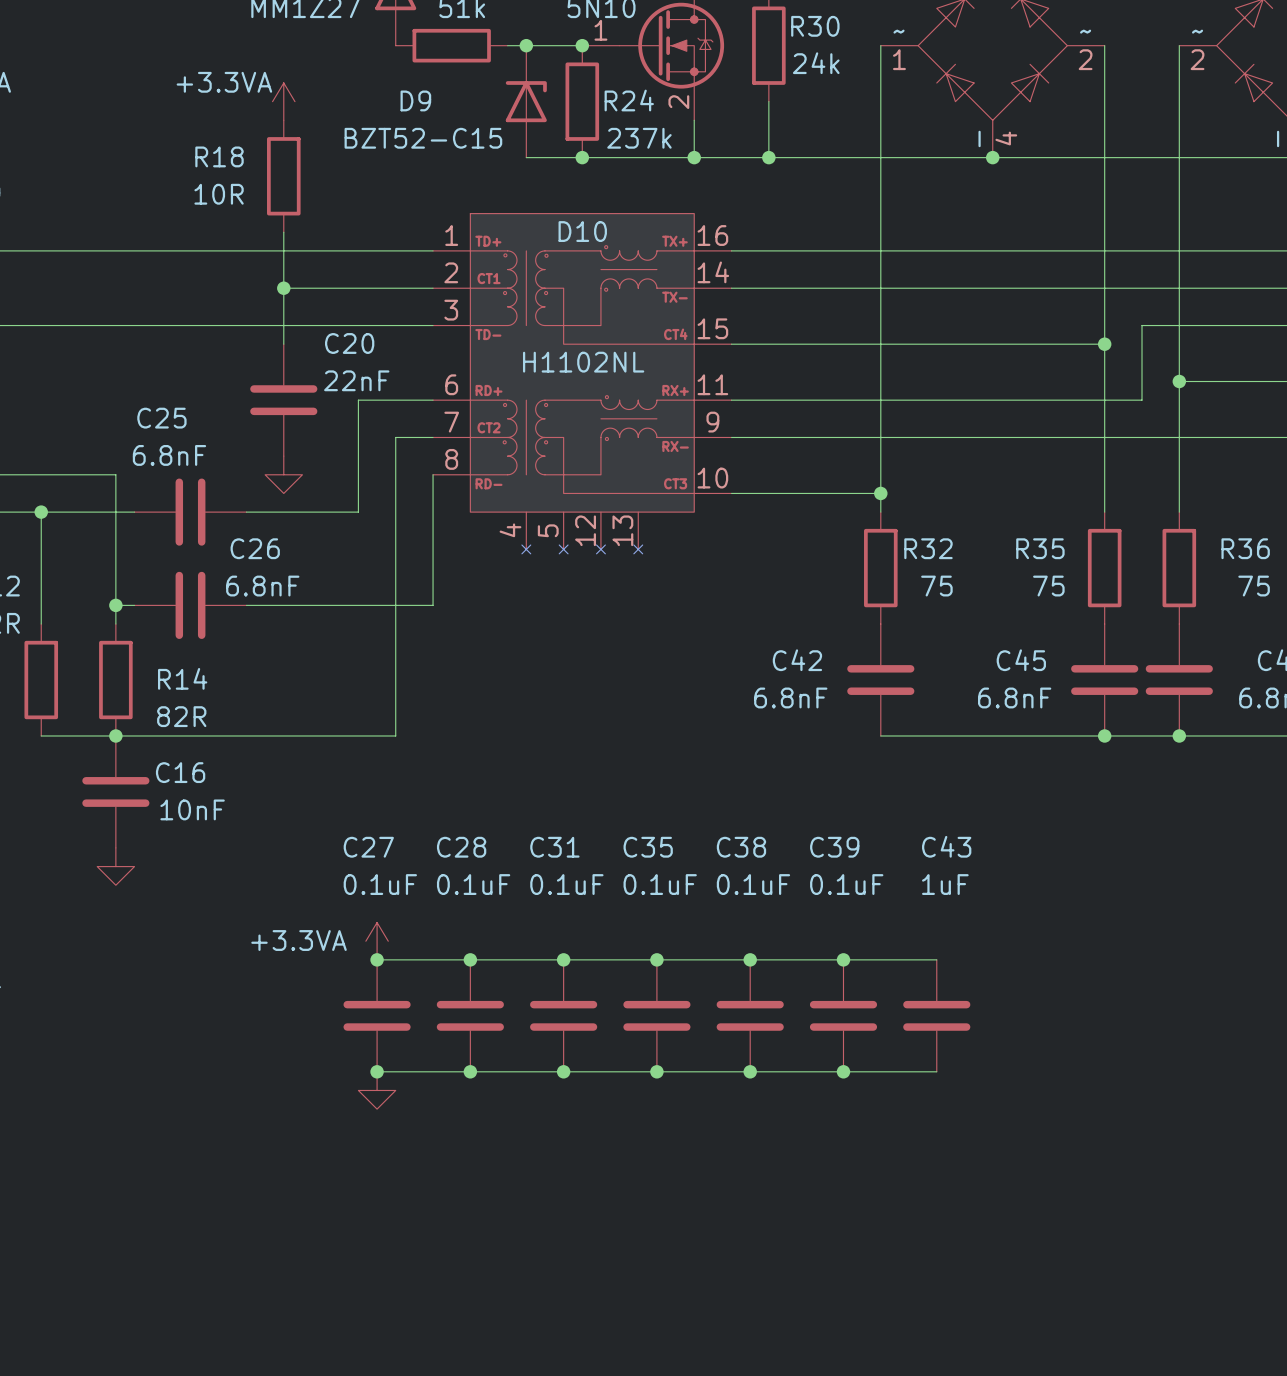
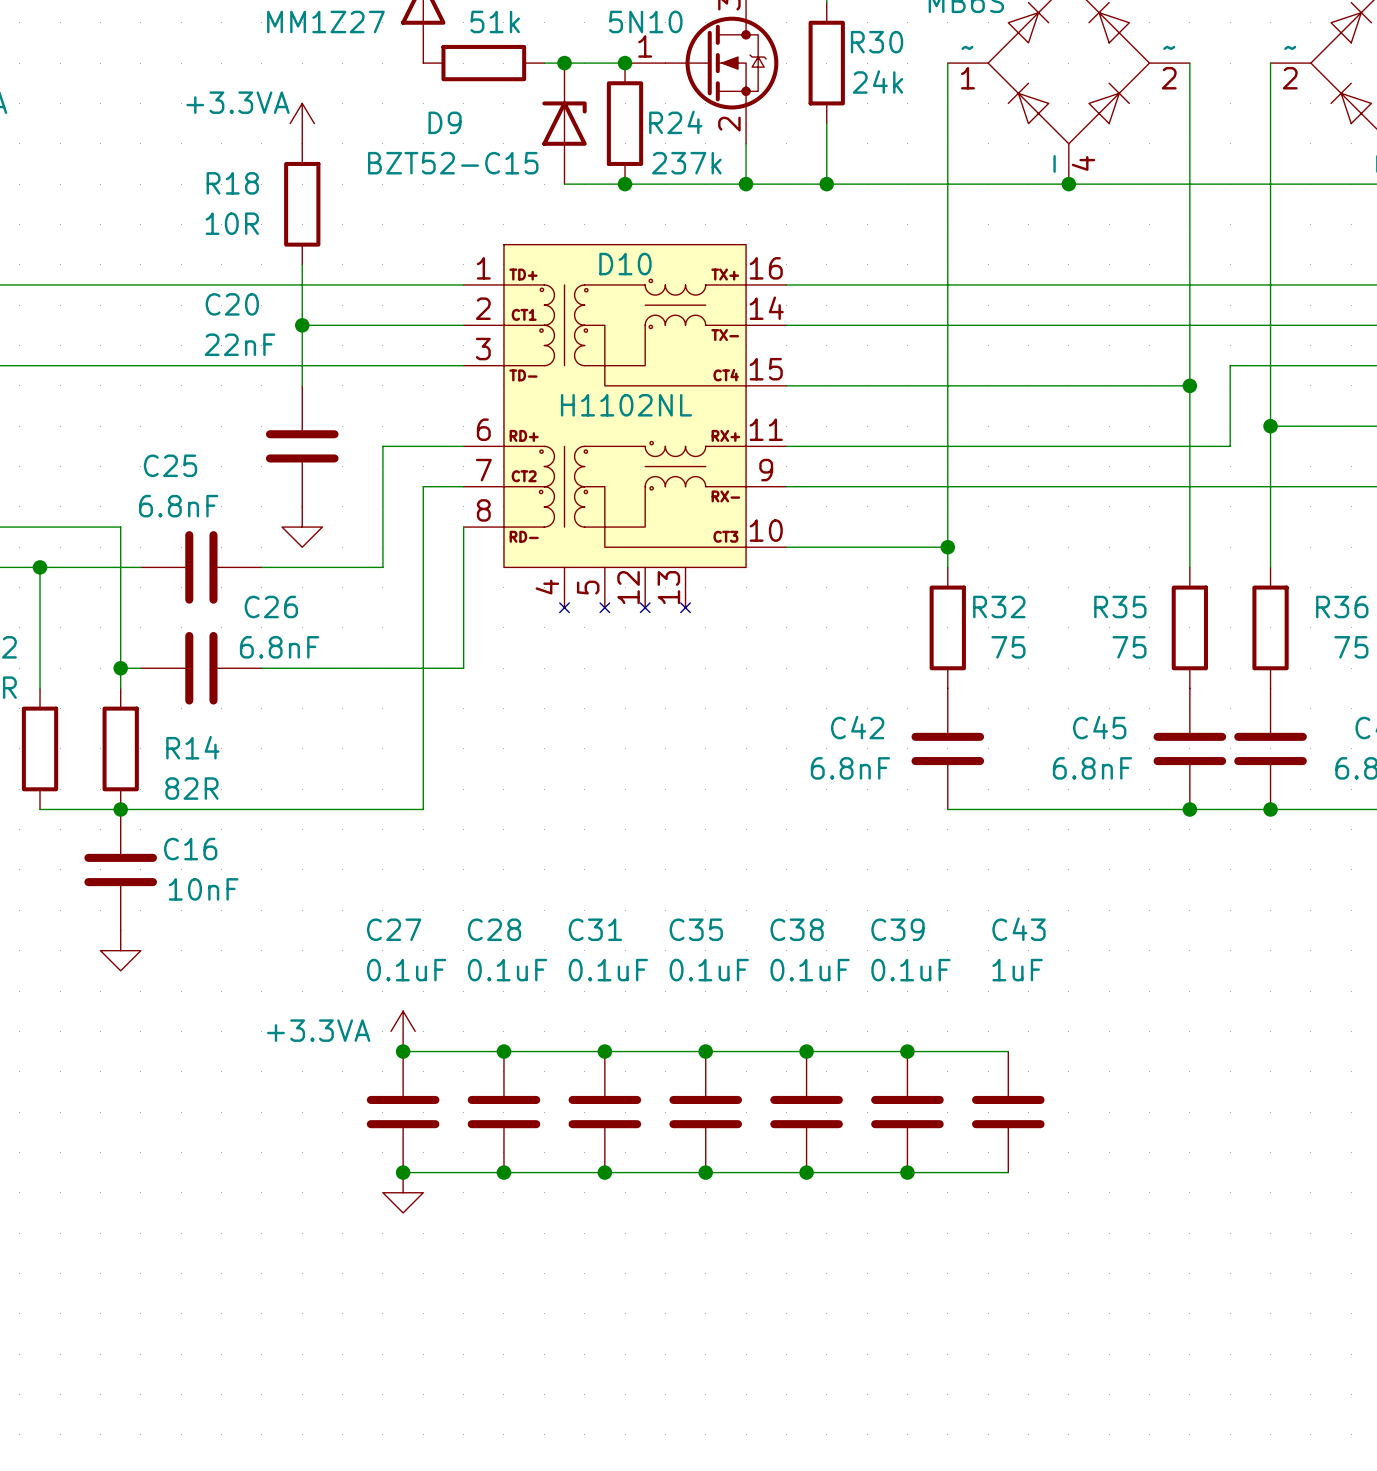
C20 name position: C20 (349, 343) -> C20 (232, 304)
C20 value position: 22nF (356, 380) -> 22nF (239, 344)

